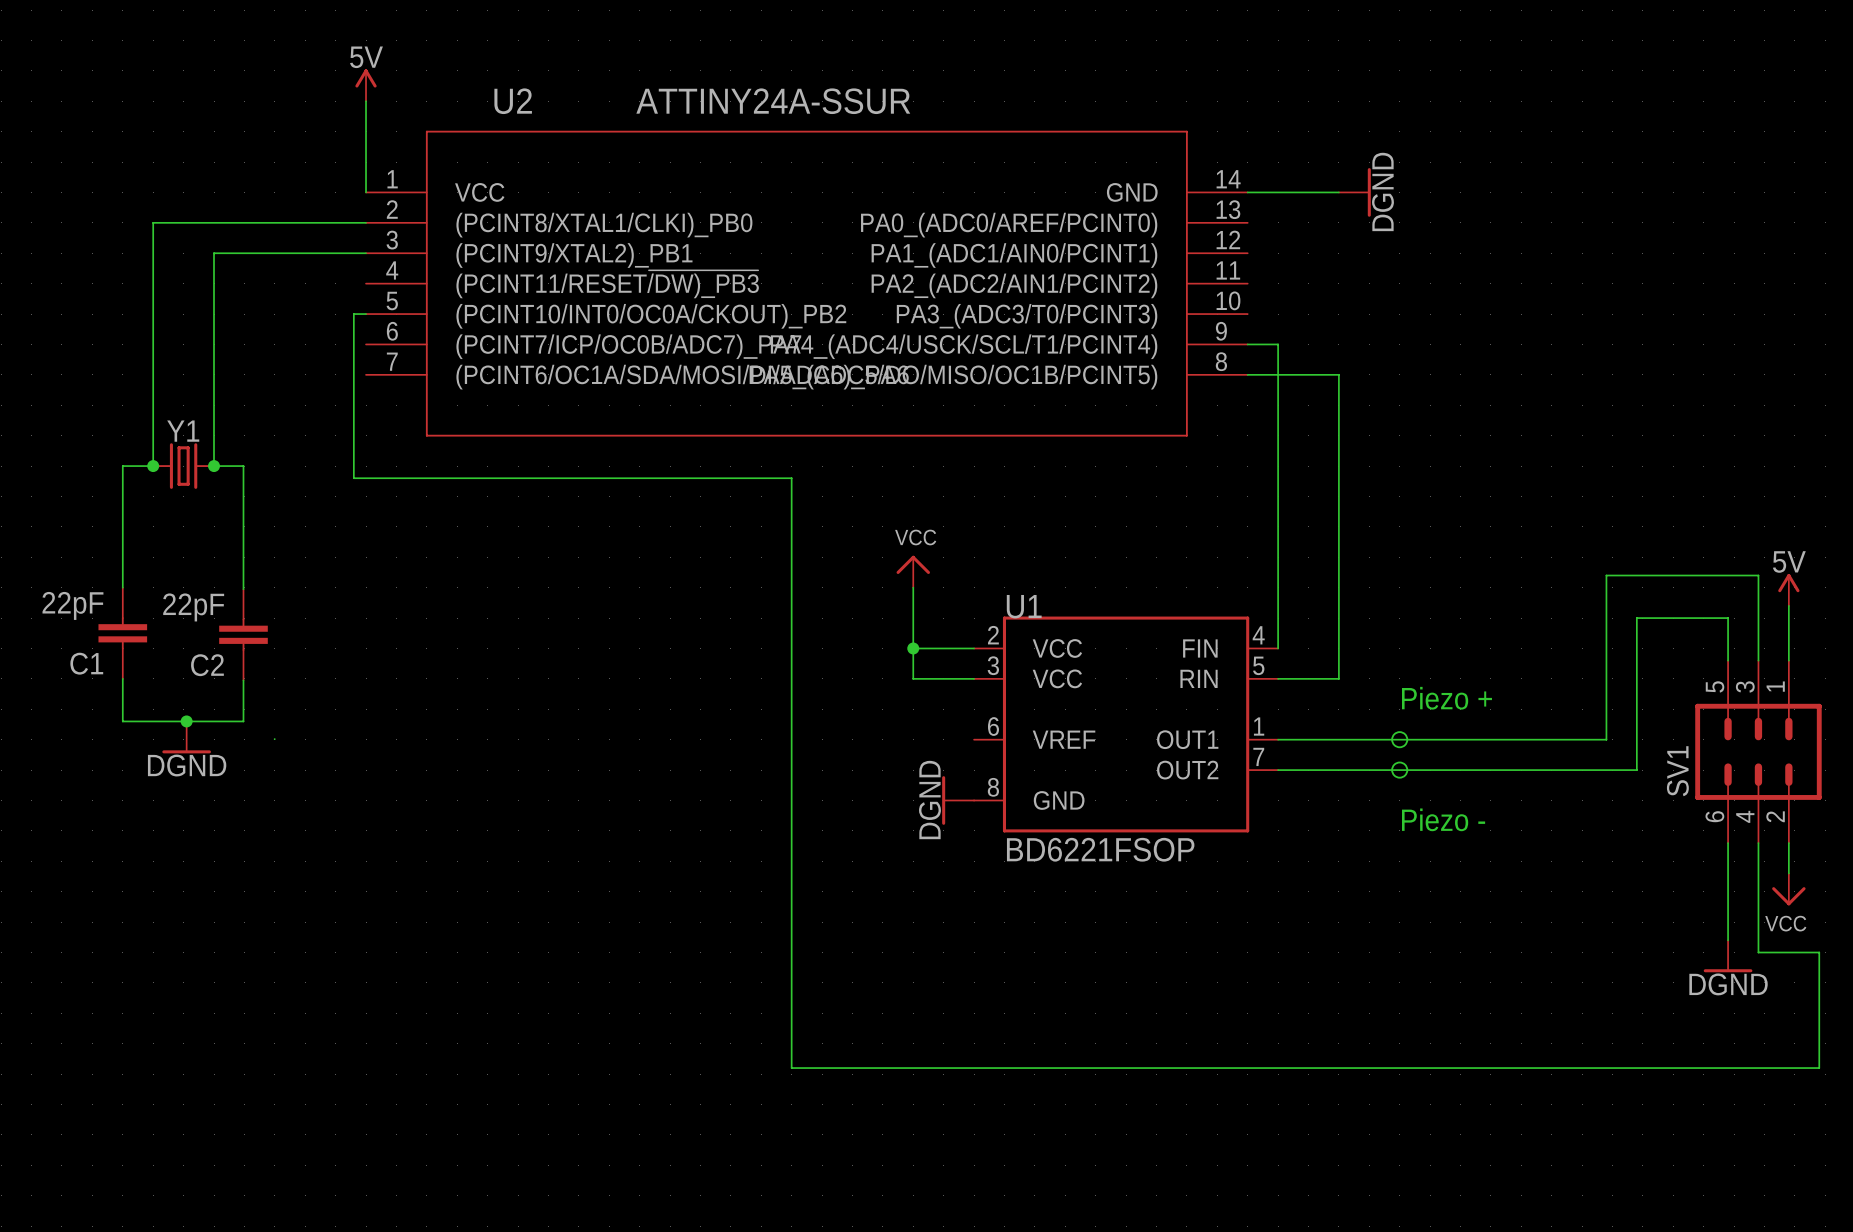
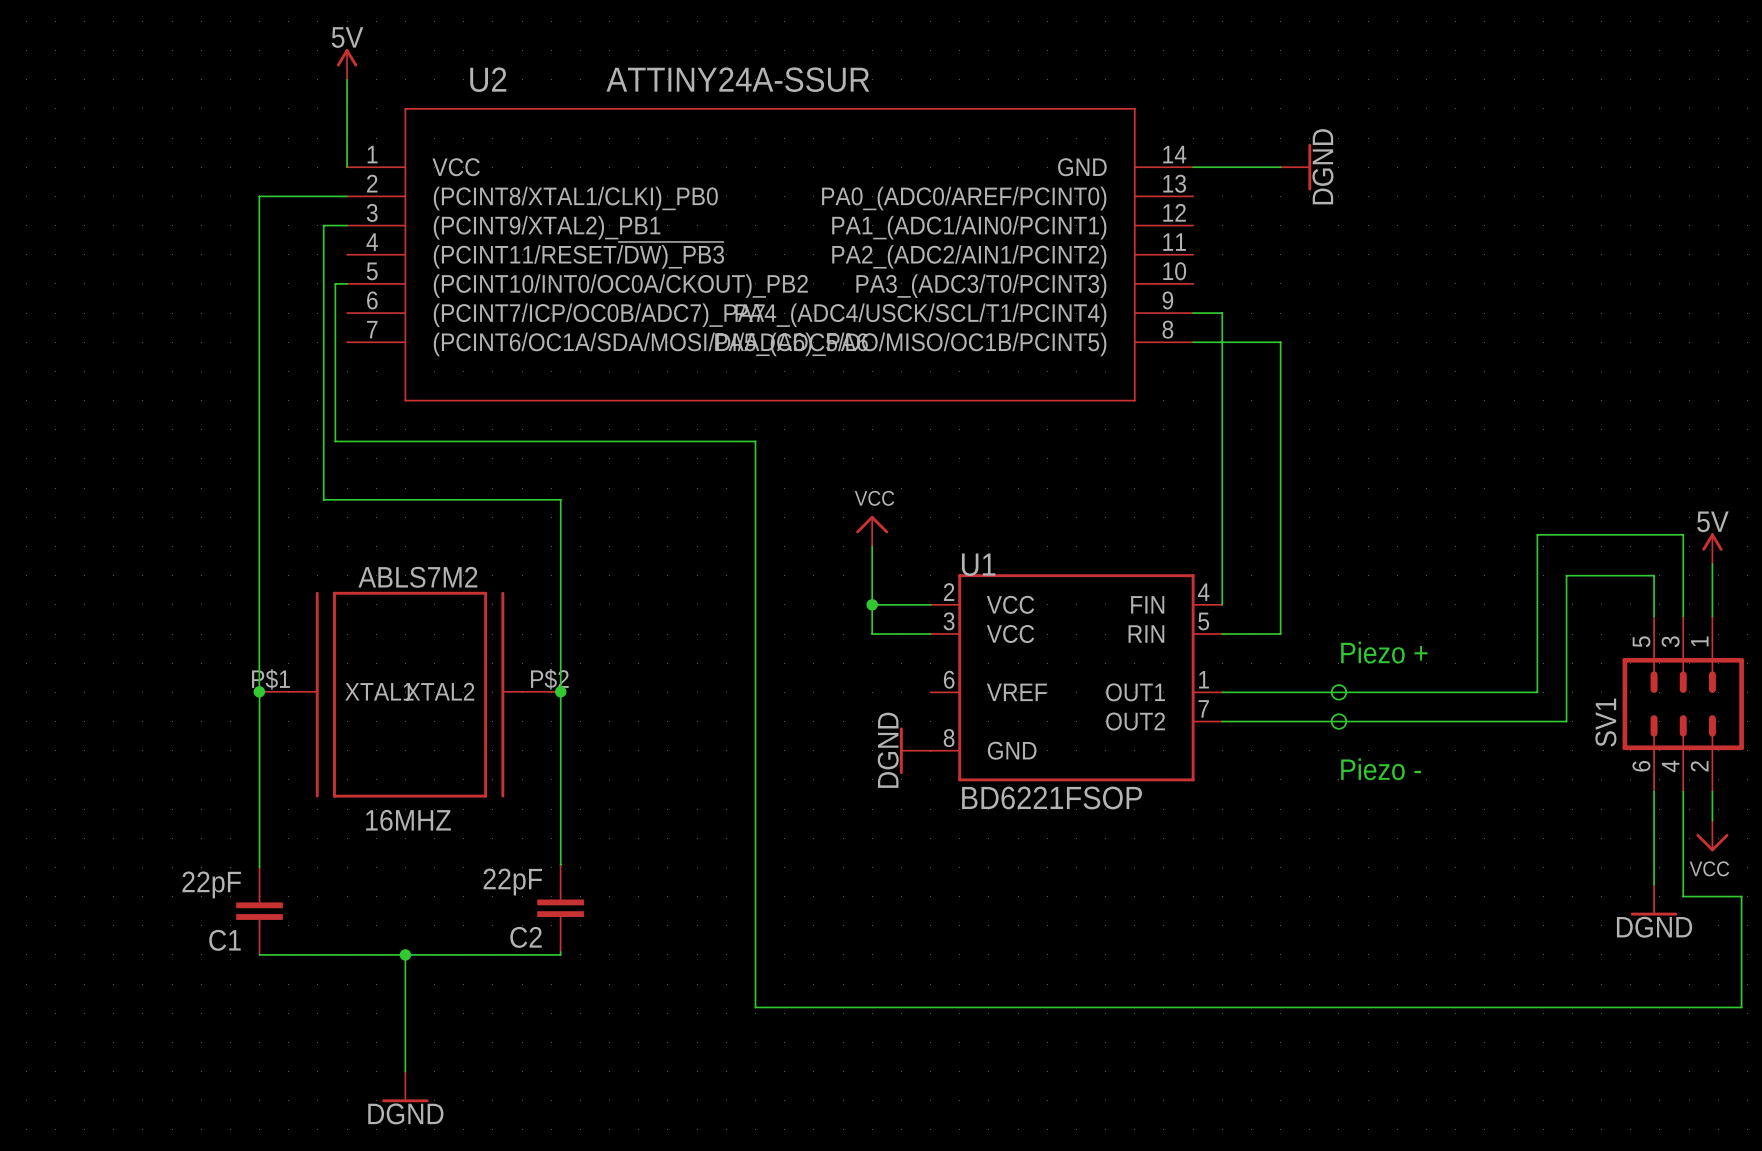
wire: (274, 222) (153, 222) (153, 466) (122, 466) (122, 587) -> (259, 196) (259, 691)
wire: (341, 253) (214, 253) (214, 466) (243, 466) (243, 589) -> (323, 225) (323, 499) (560, 499) (560, 864)
junction: (153, 466) -> none
Y1: (183, 466) -> none
junction: (214, 466) -> none
C1 position: (122, 633) -> (259, 911)
C2 position: (243, 634) -> (560, 908)
wire: (122, 678) (122, 721) (243, 721) (243, 680) -> none
junction: (186, 721) -> none
power symbol: DGND (186, 737) -> none
wire: none -> (259, 691) (259, 867)
junction: none -> (259, 691)
junction: none -> (560, 691)
part: none -> (410, 694)
wire: none -> (560, 952) (560, 954) (259, 954)
wire: none -> (405, 954) (405, 1071)
junction: none -> (405, 954)
power symbol: none -> DGND (405, 1086)

